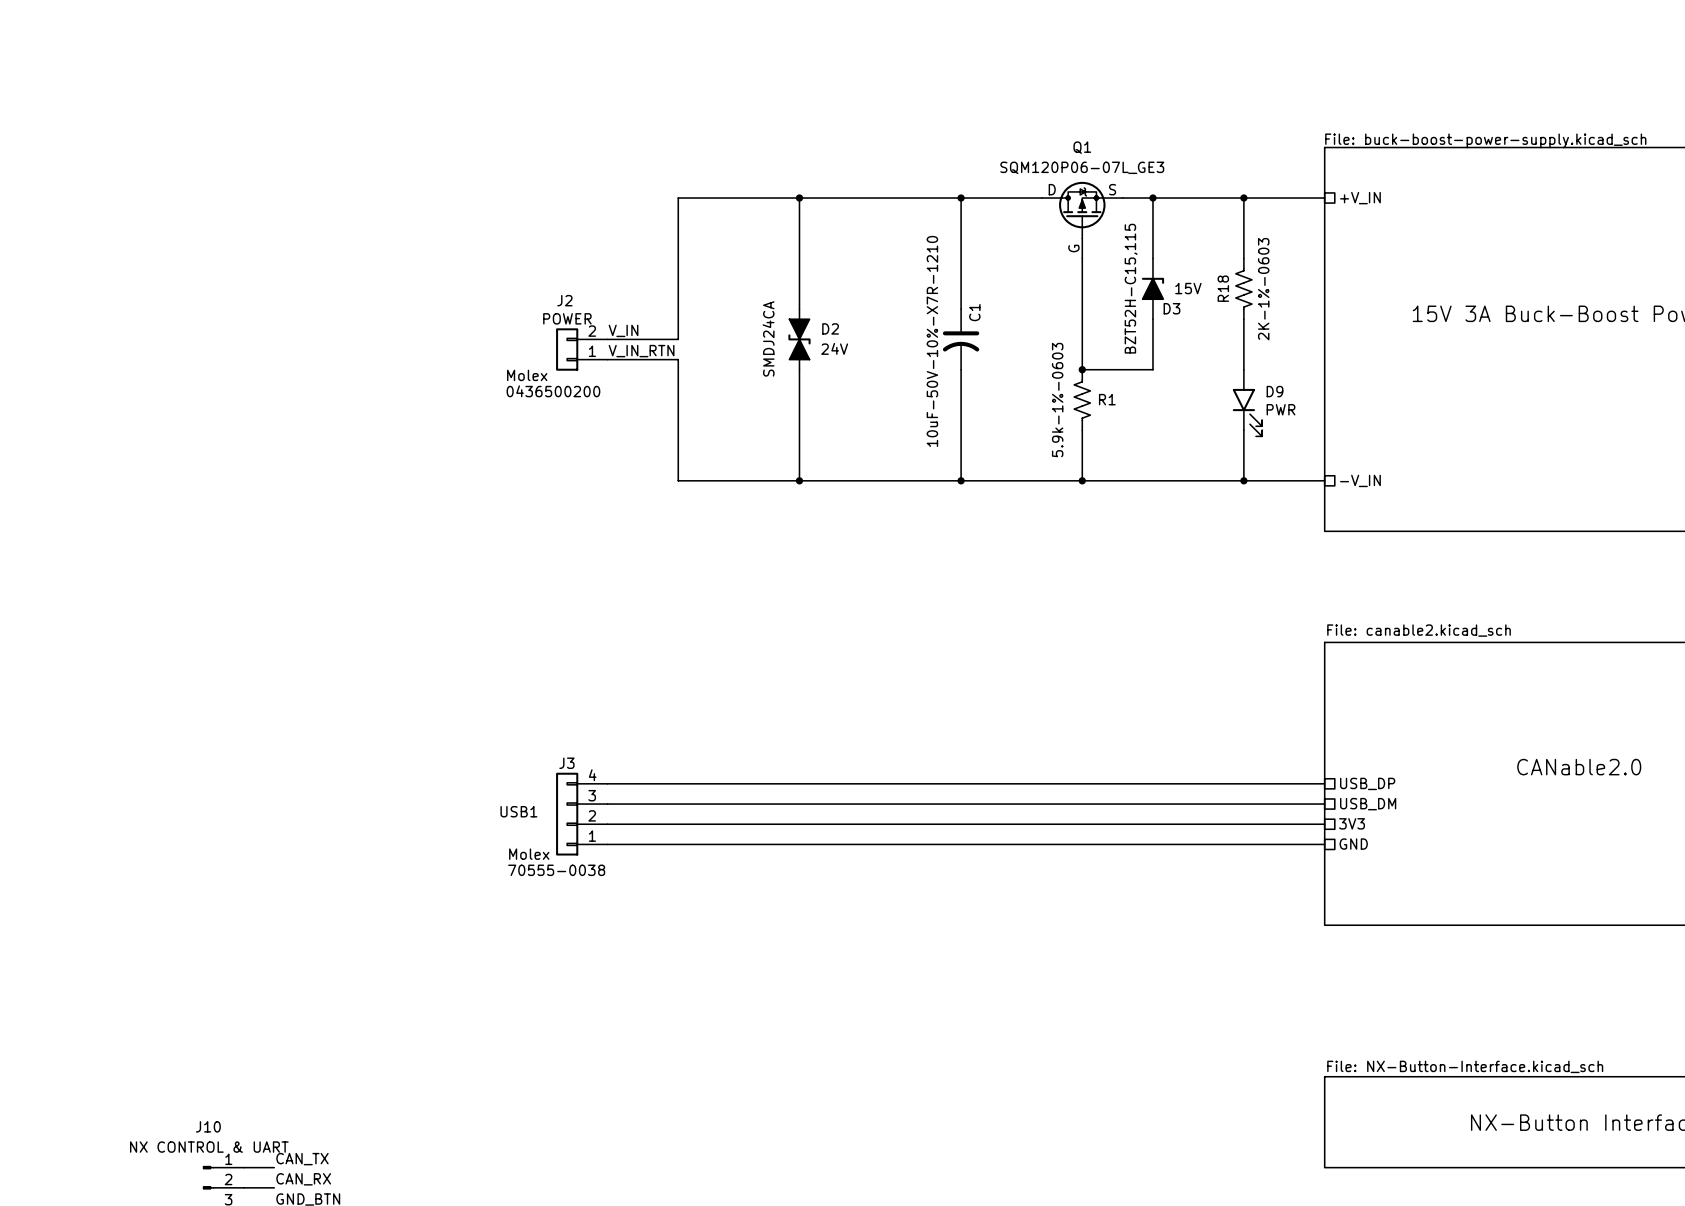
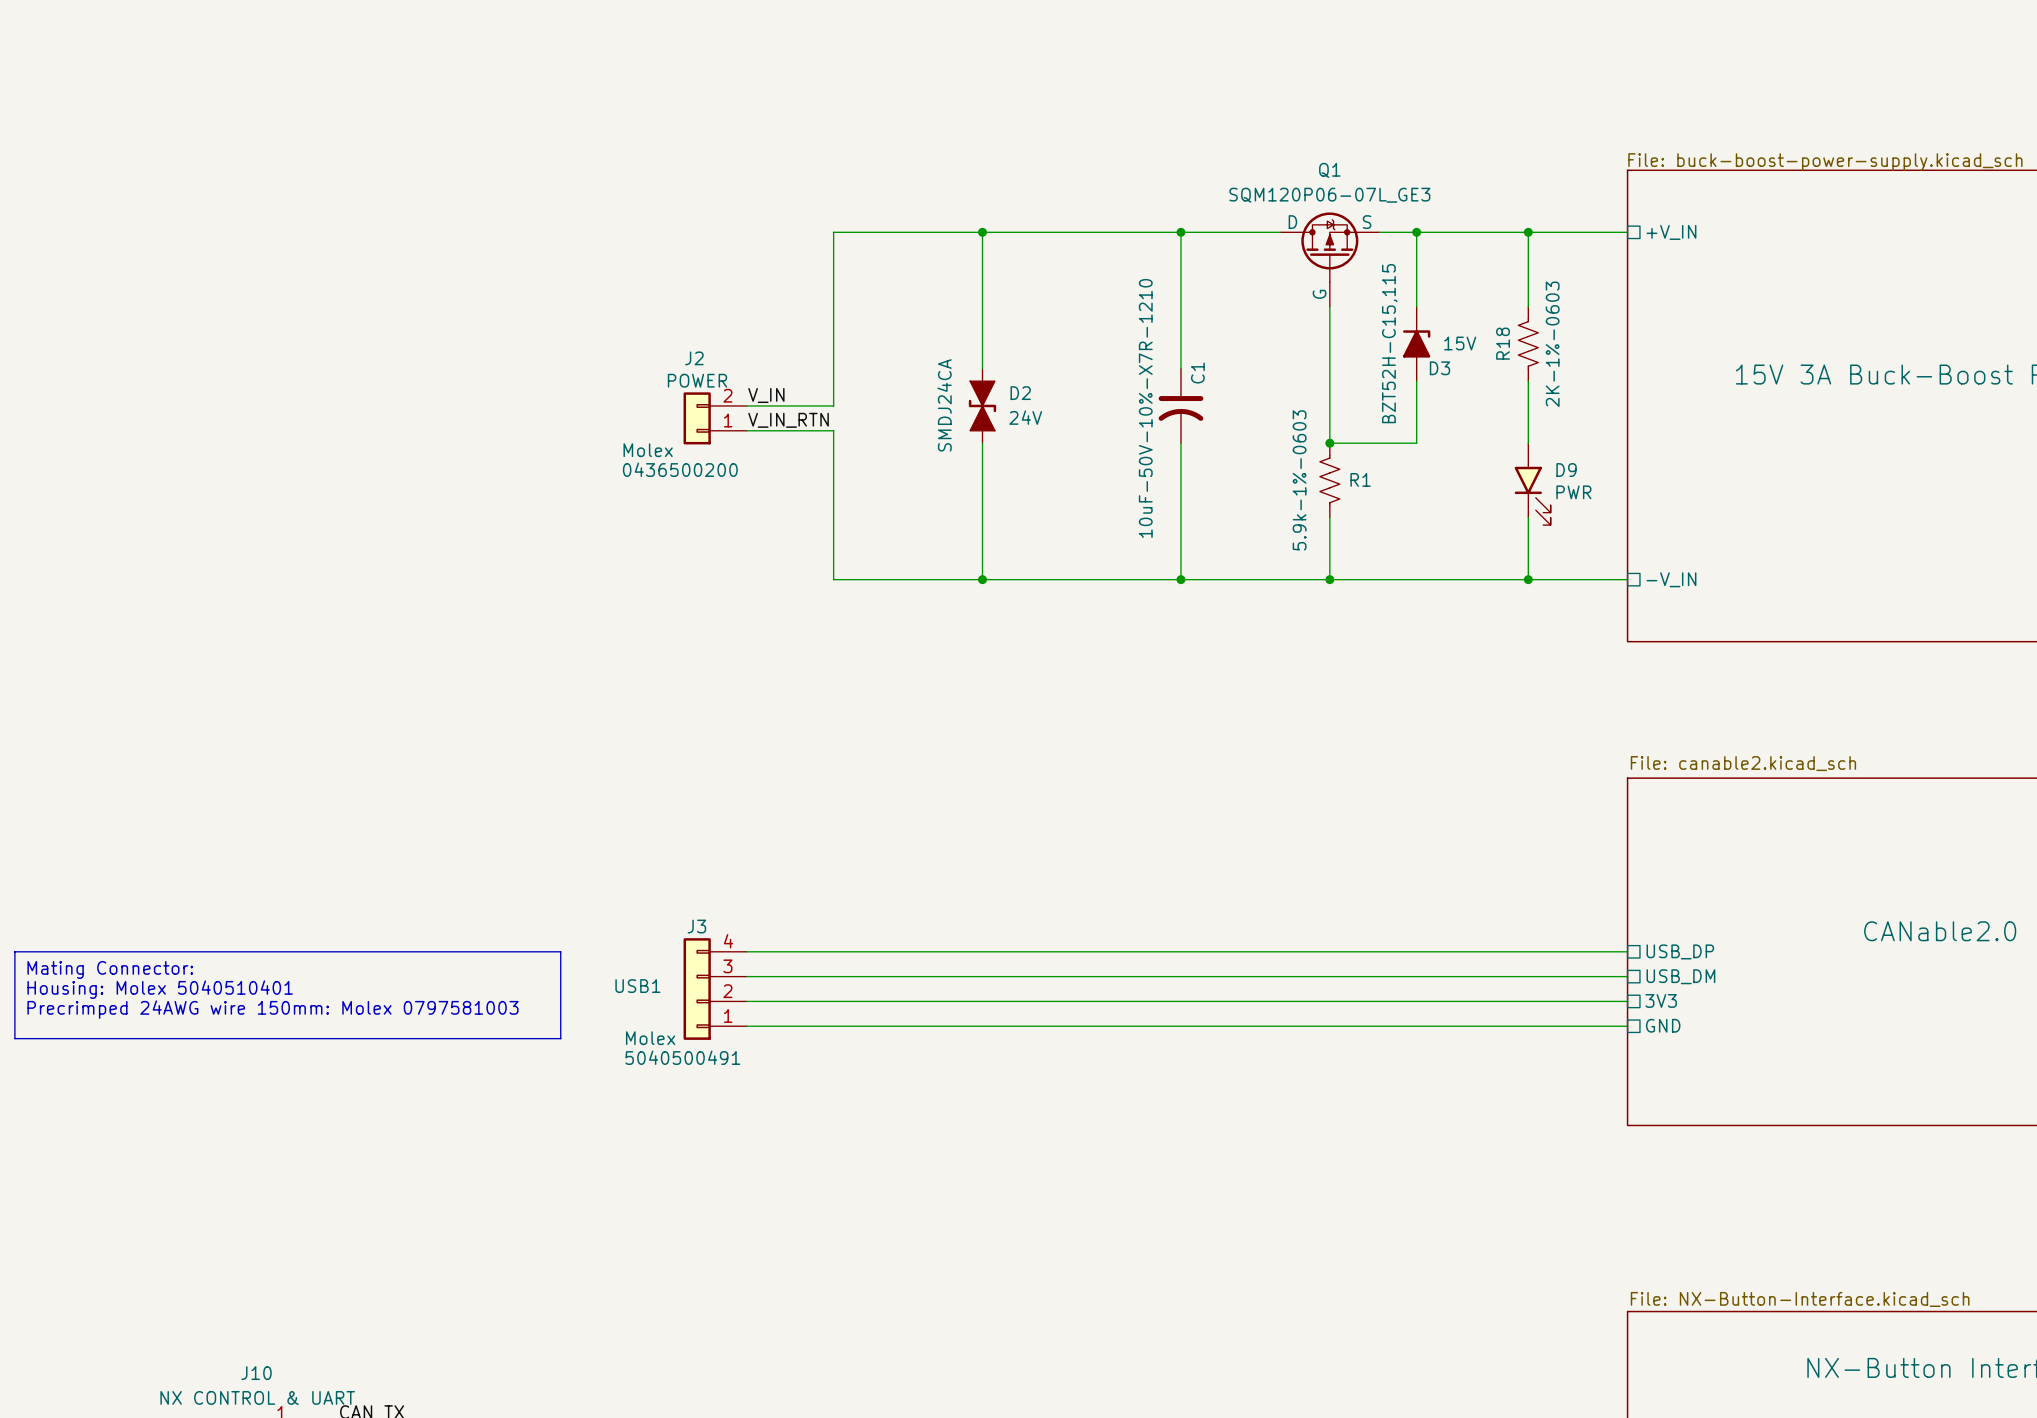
line: none -> (14, 951) (560, 951) (560, 1038) (14, 1038) (14, 951)
text: none -> Mating Connector: (110, 969)
text: none -> Housing: Molex 5040510401 (160, 989)
text: none -> Precrimped 24AWG wire 150mm: Molex 0797581003 (272, 1009)
J3 text: 70555-0038 (556, 870) -> 5040500491 (682, 1057)

